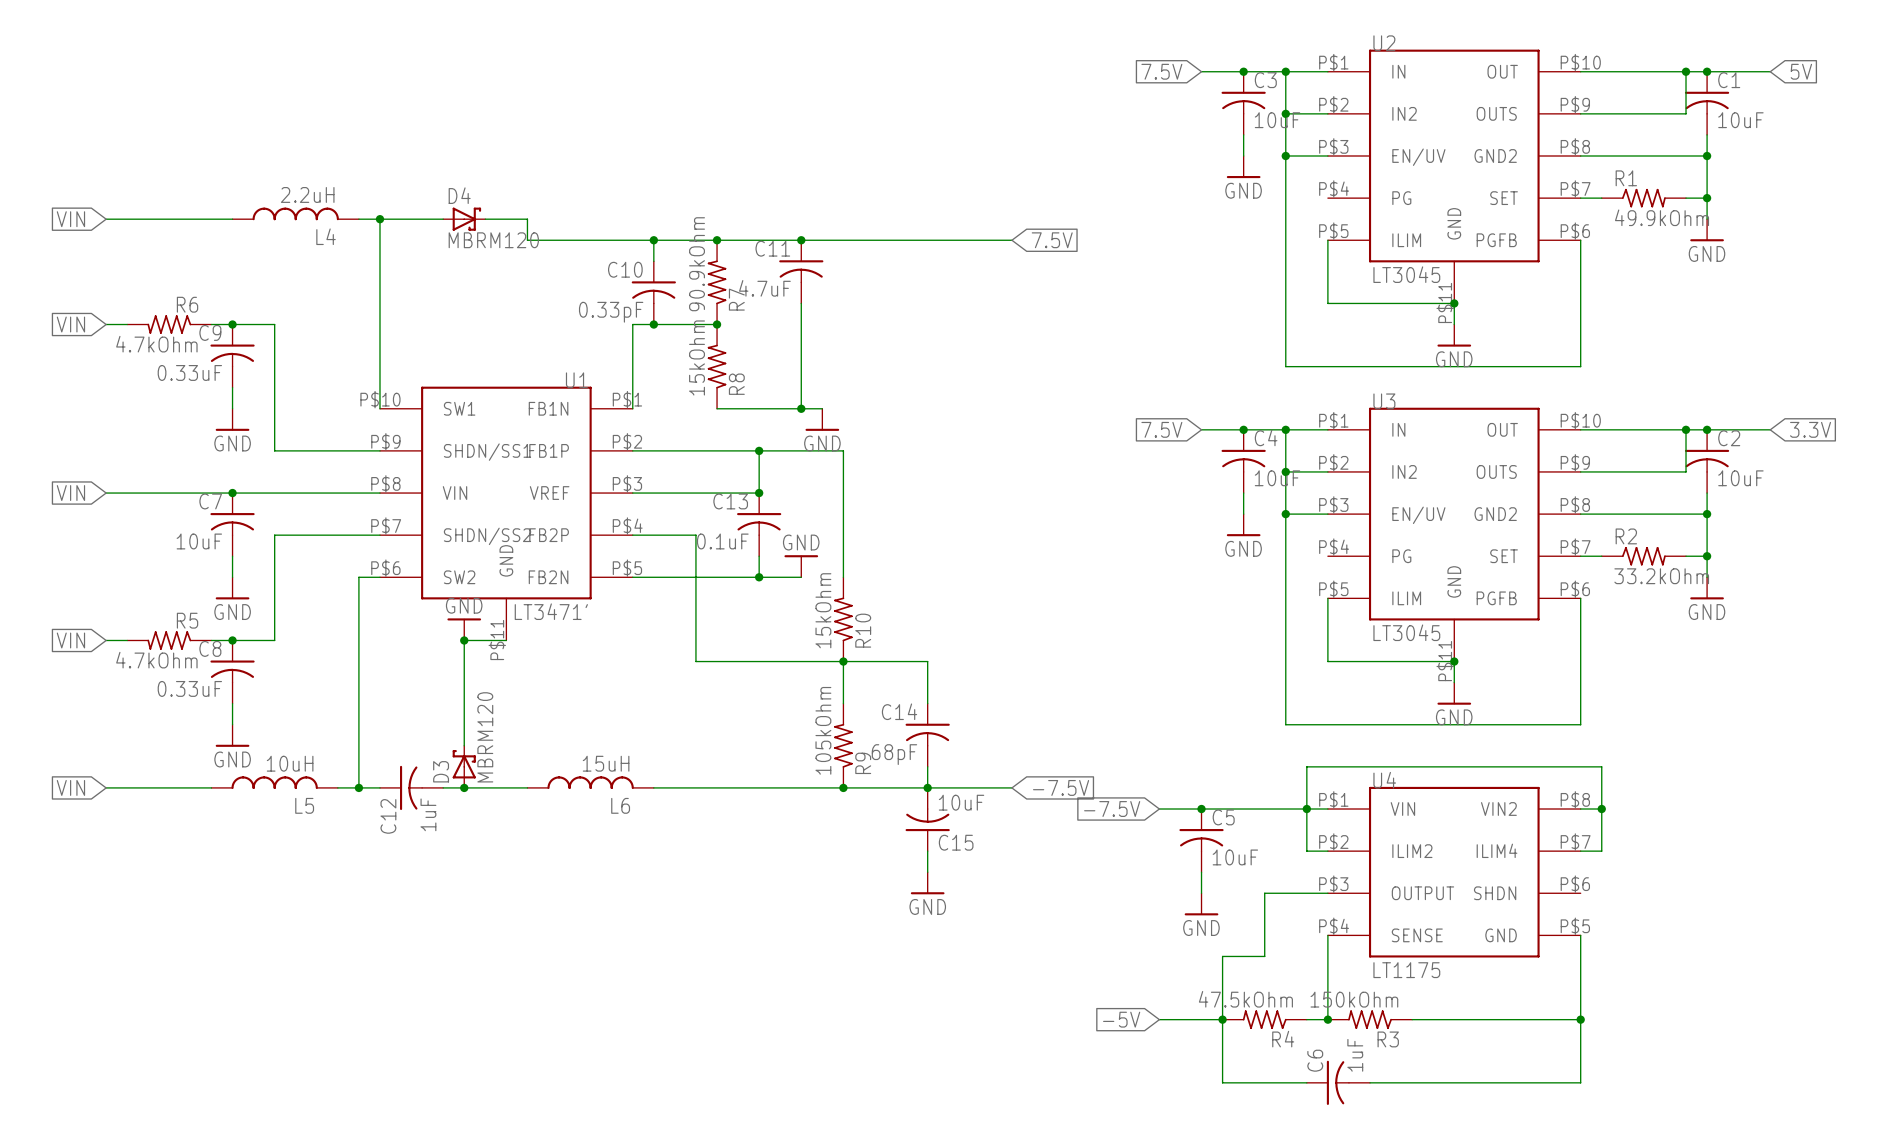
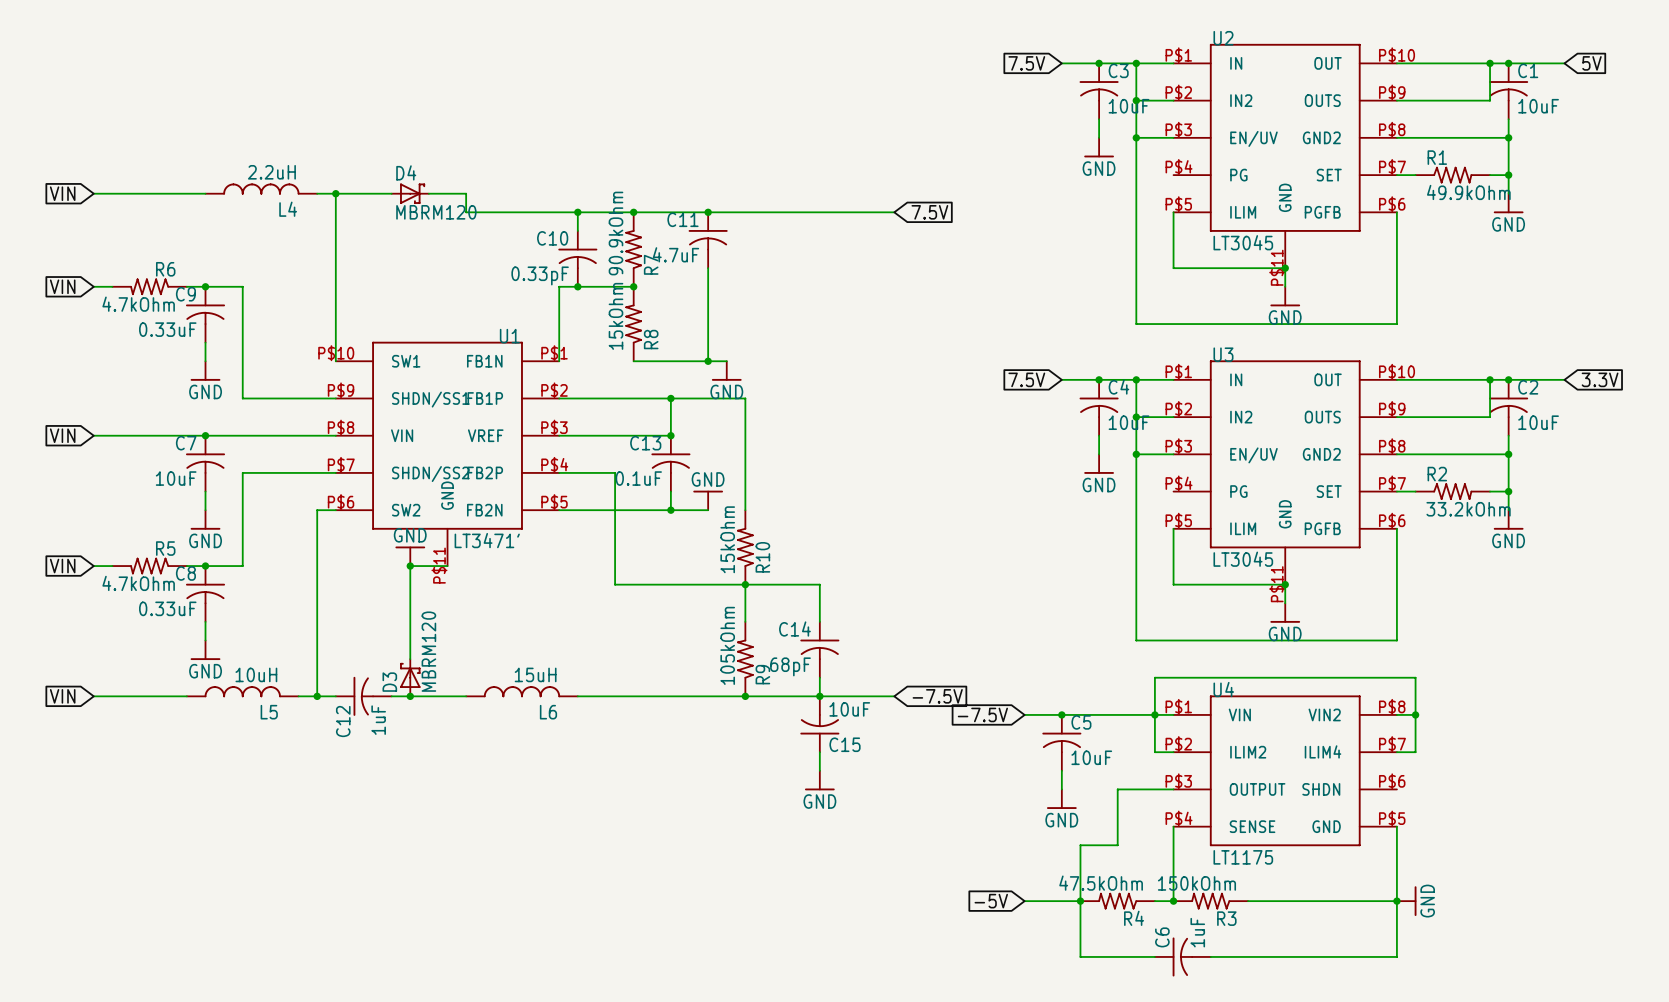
power symbol: none -> GND (1406, 901)

